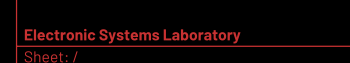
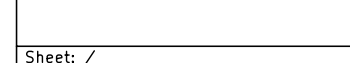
title block: Electronic Systems Laboratory (132, 36) -> none

